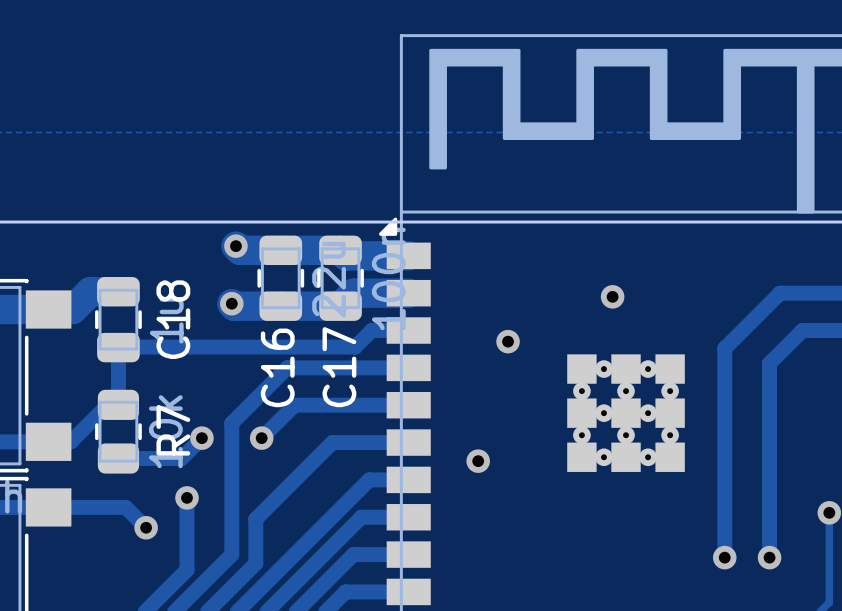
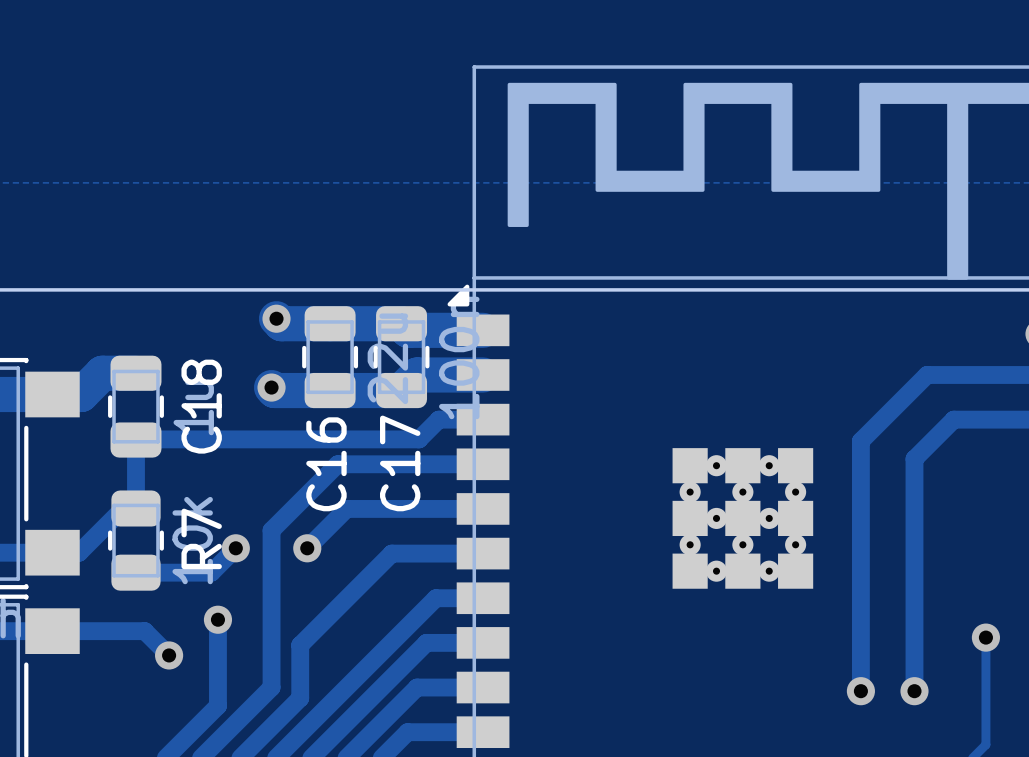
via: (612, 296) -> none
via: (508, 341) -> none
via: (478, 461) -> none

